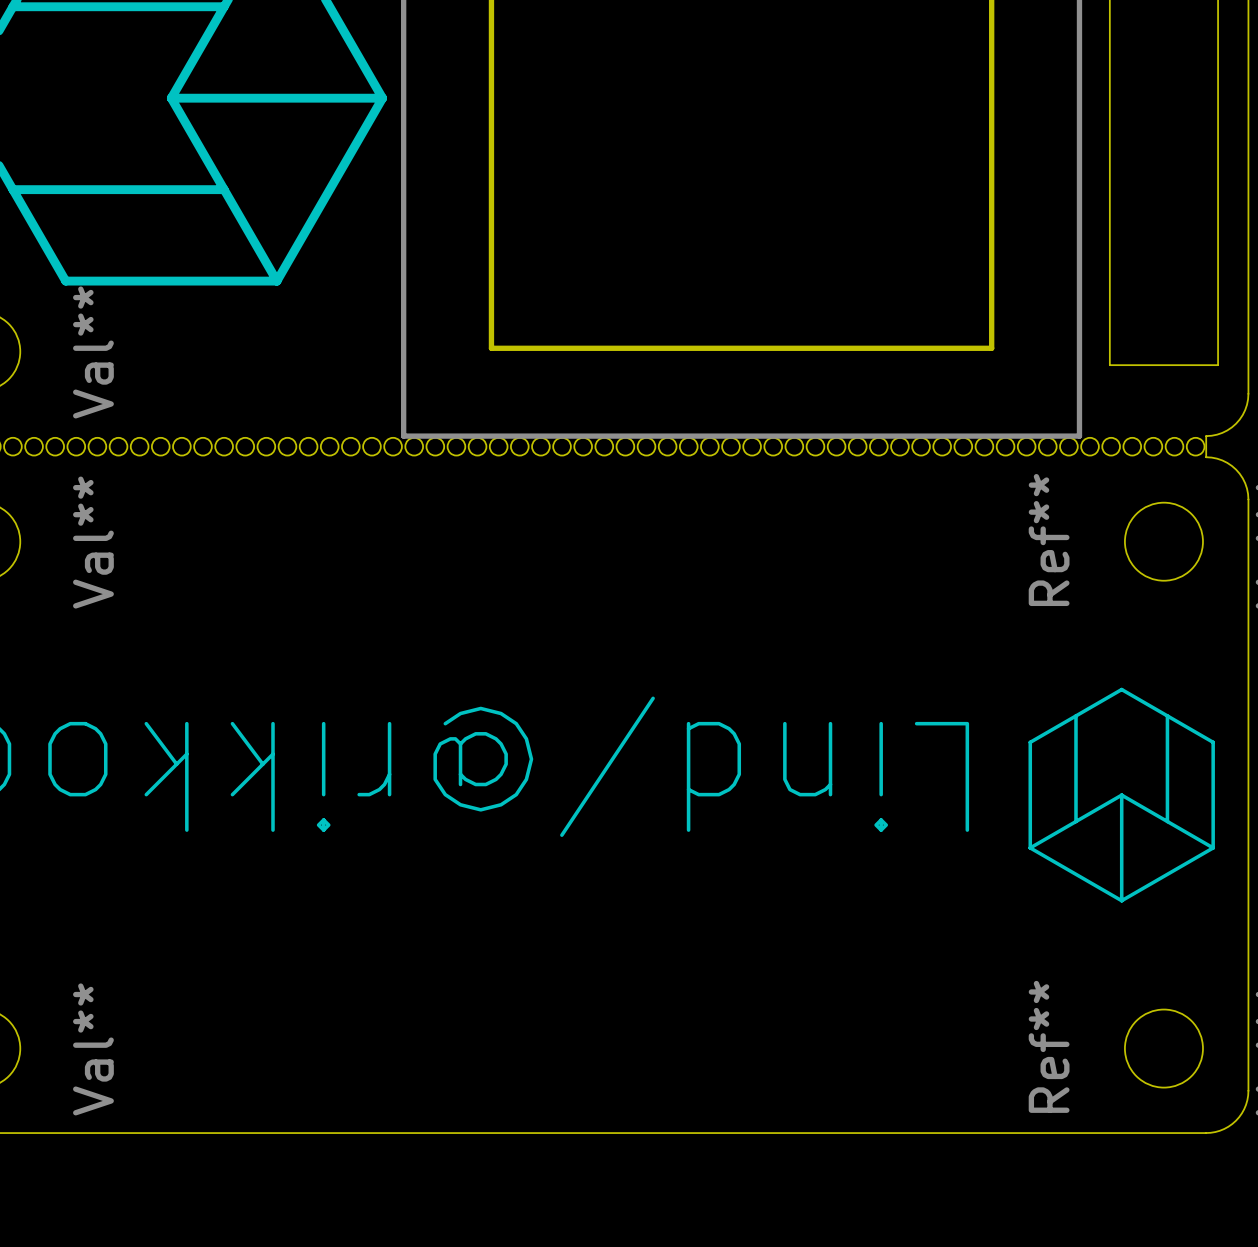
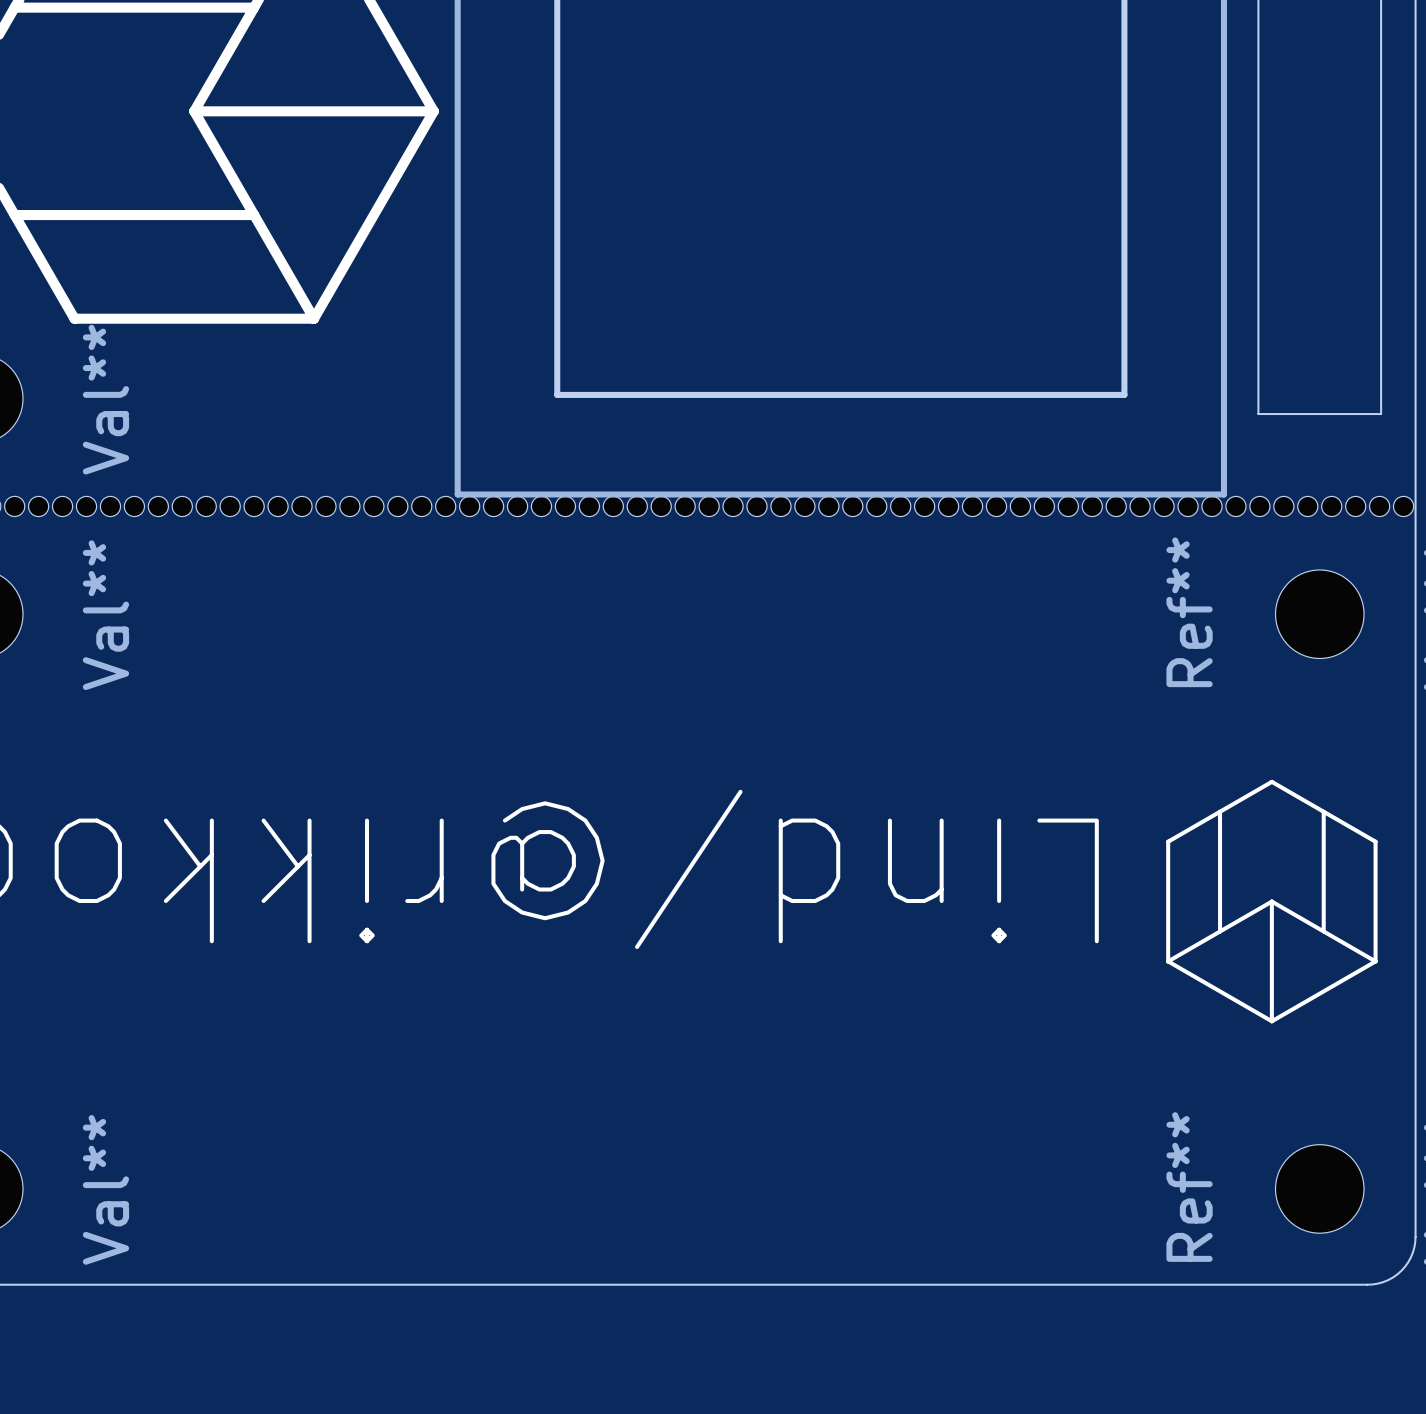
board edge: (1248, 393) (1245, 410) (1236, 423) (1222, 432) (1206, 436) (1206, 457) (1222, 460) (1236, 469) (1245, 483) (1248, 499) -> (1415, 446) (1415, 566)
part: none -> (1391, 506)

